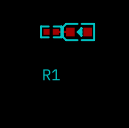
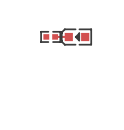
R1 name: R1 (51, 74) -> none

